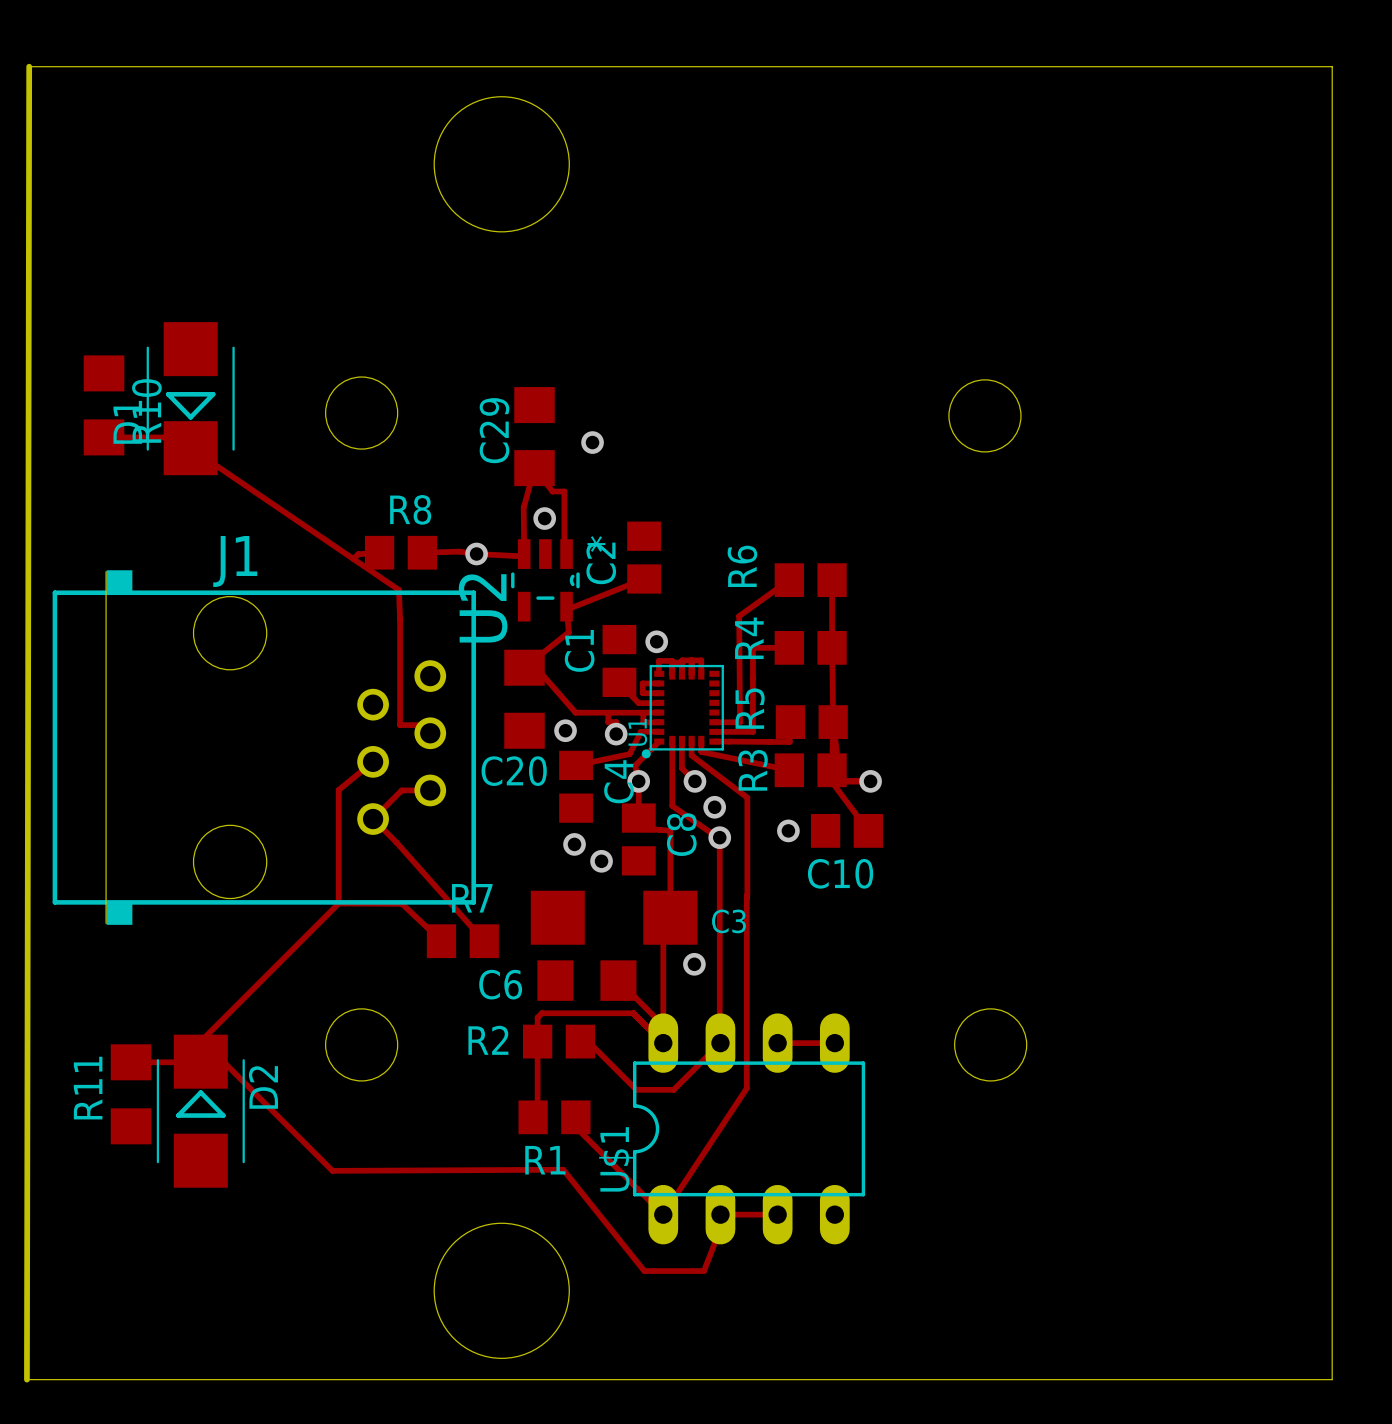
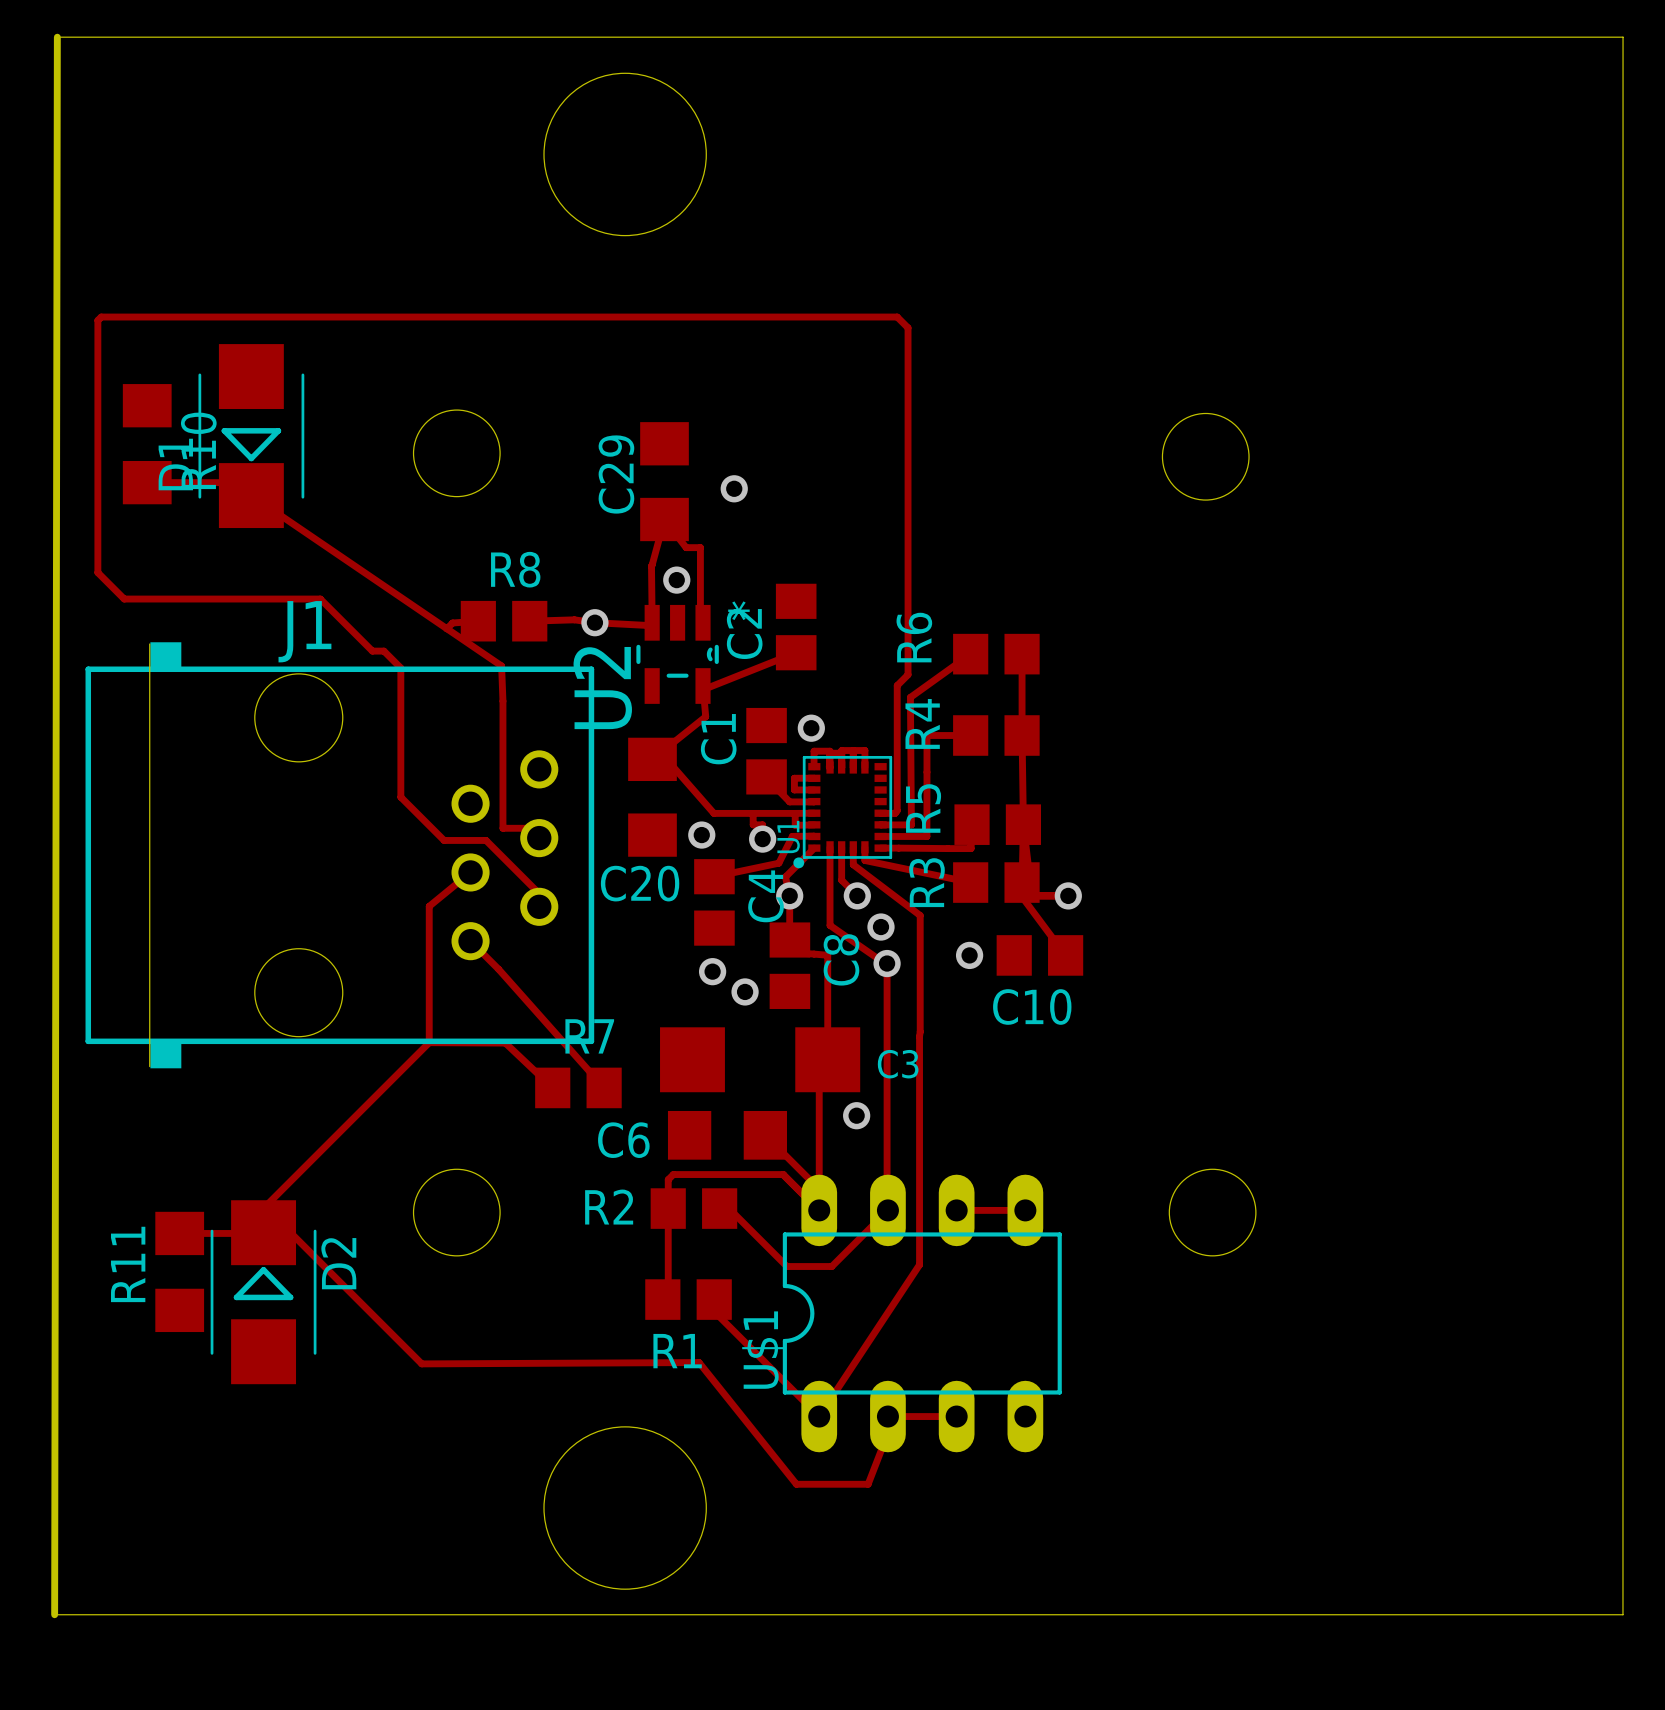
track: (430, 790) (401, 790) (373, 819) -> (539, 906) (539, 893) (486, 840) (444, 840) (400, 797) (400, 668) (383, 651) (372, 651) (320, 599) (124, 599) (97, 572) (97, 320) (101, 317) (897, 317) (908, 327) (908, 674) (897, 685) (897, 810) (895, 813) (881, 813)

